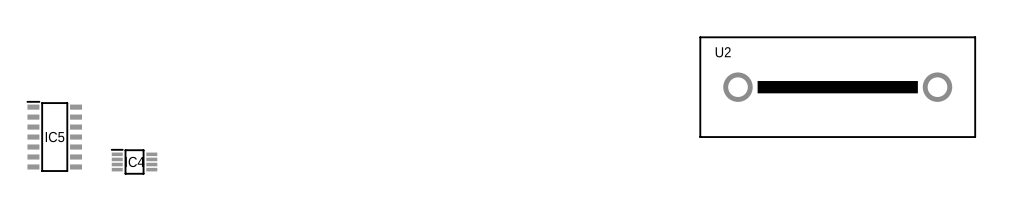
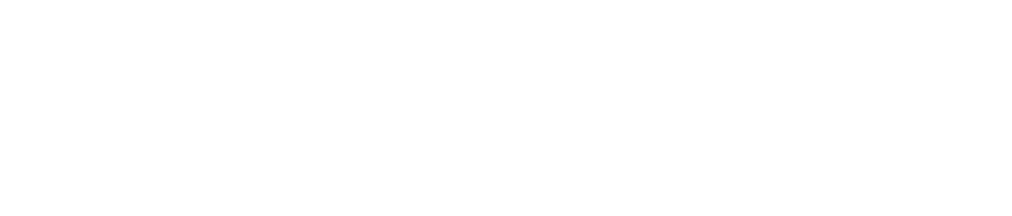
U2: (837, 87) -> none
IC5: (54, 136) -> none
IC4: (134, 161) -> none

